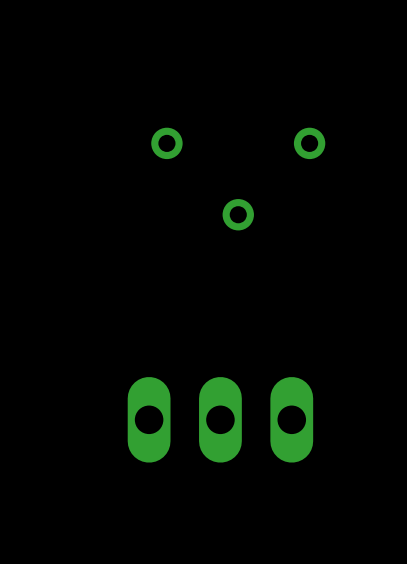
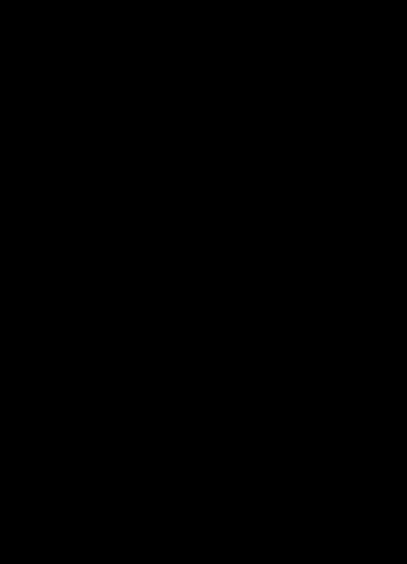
part: (238, 179) -> none
part: (220, 419) -> none

